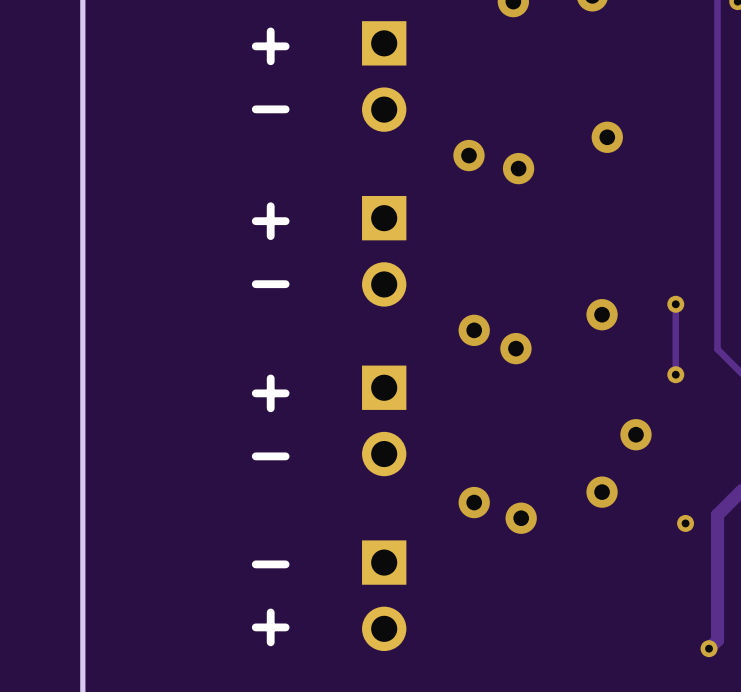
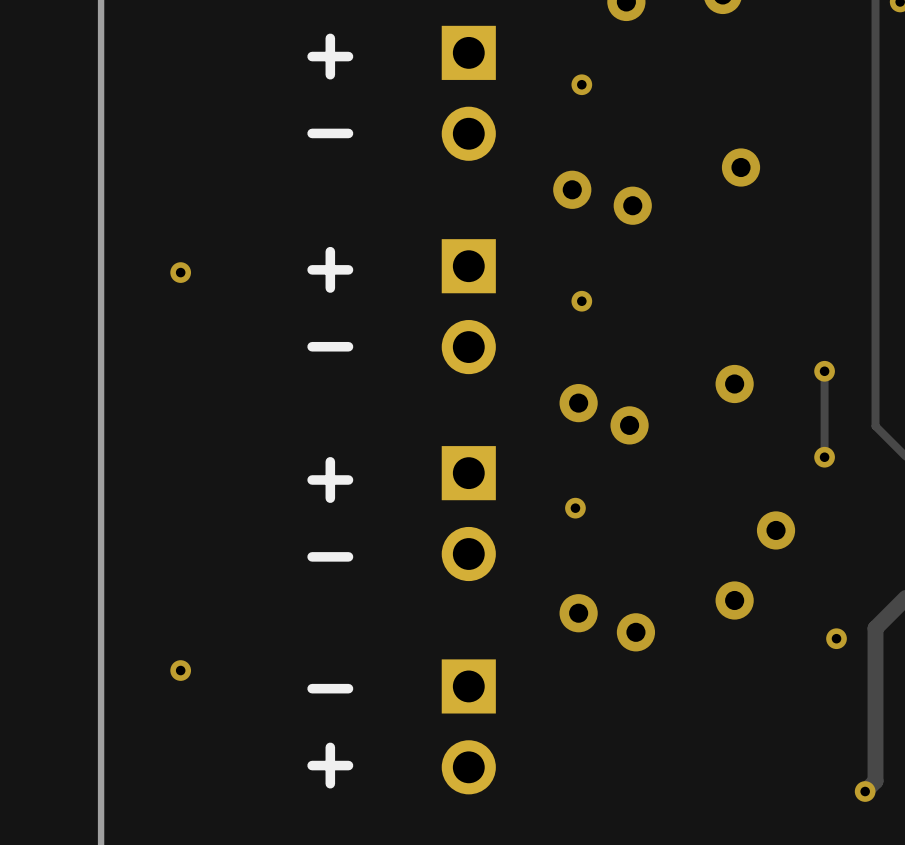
via: none -> (581, 84)
via: none -> (180, 272)
via: none -> (581, 301)
via: none -> (575, 508)
via: none -> (180, 670)

